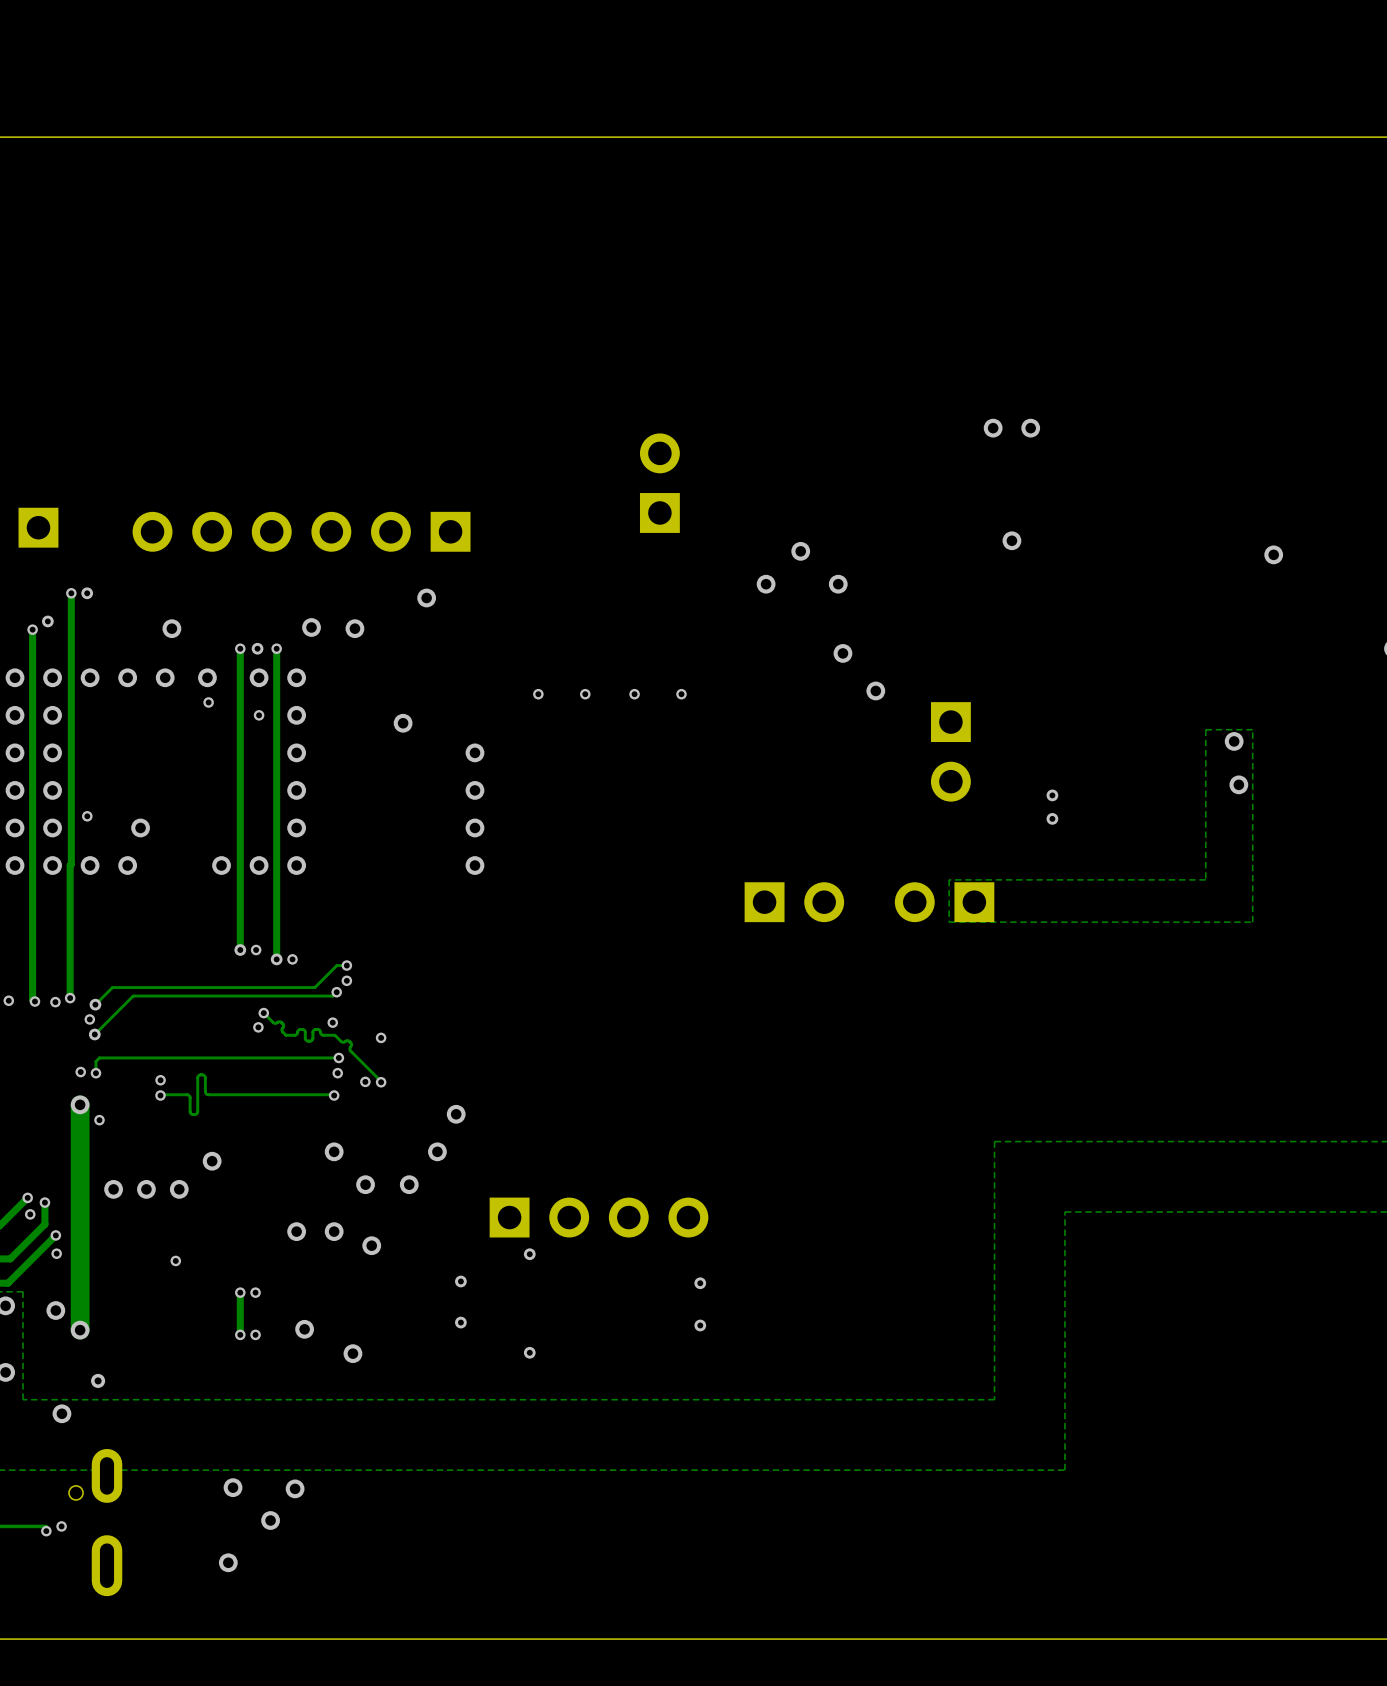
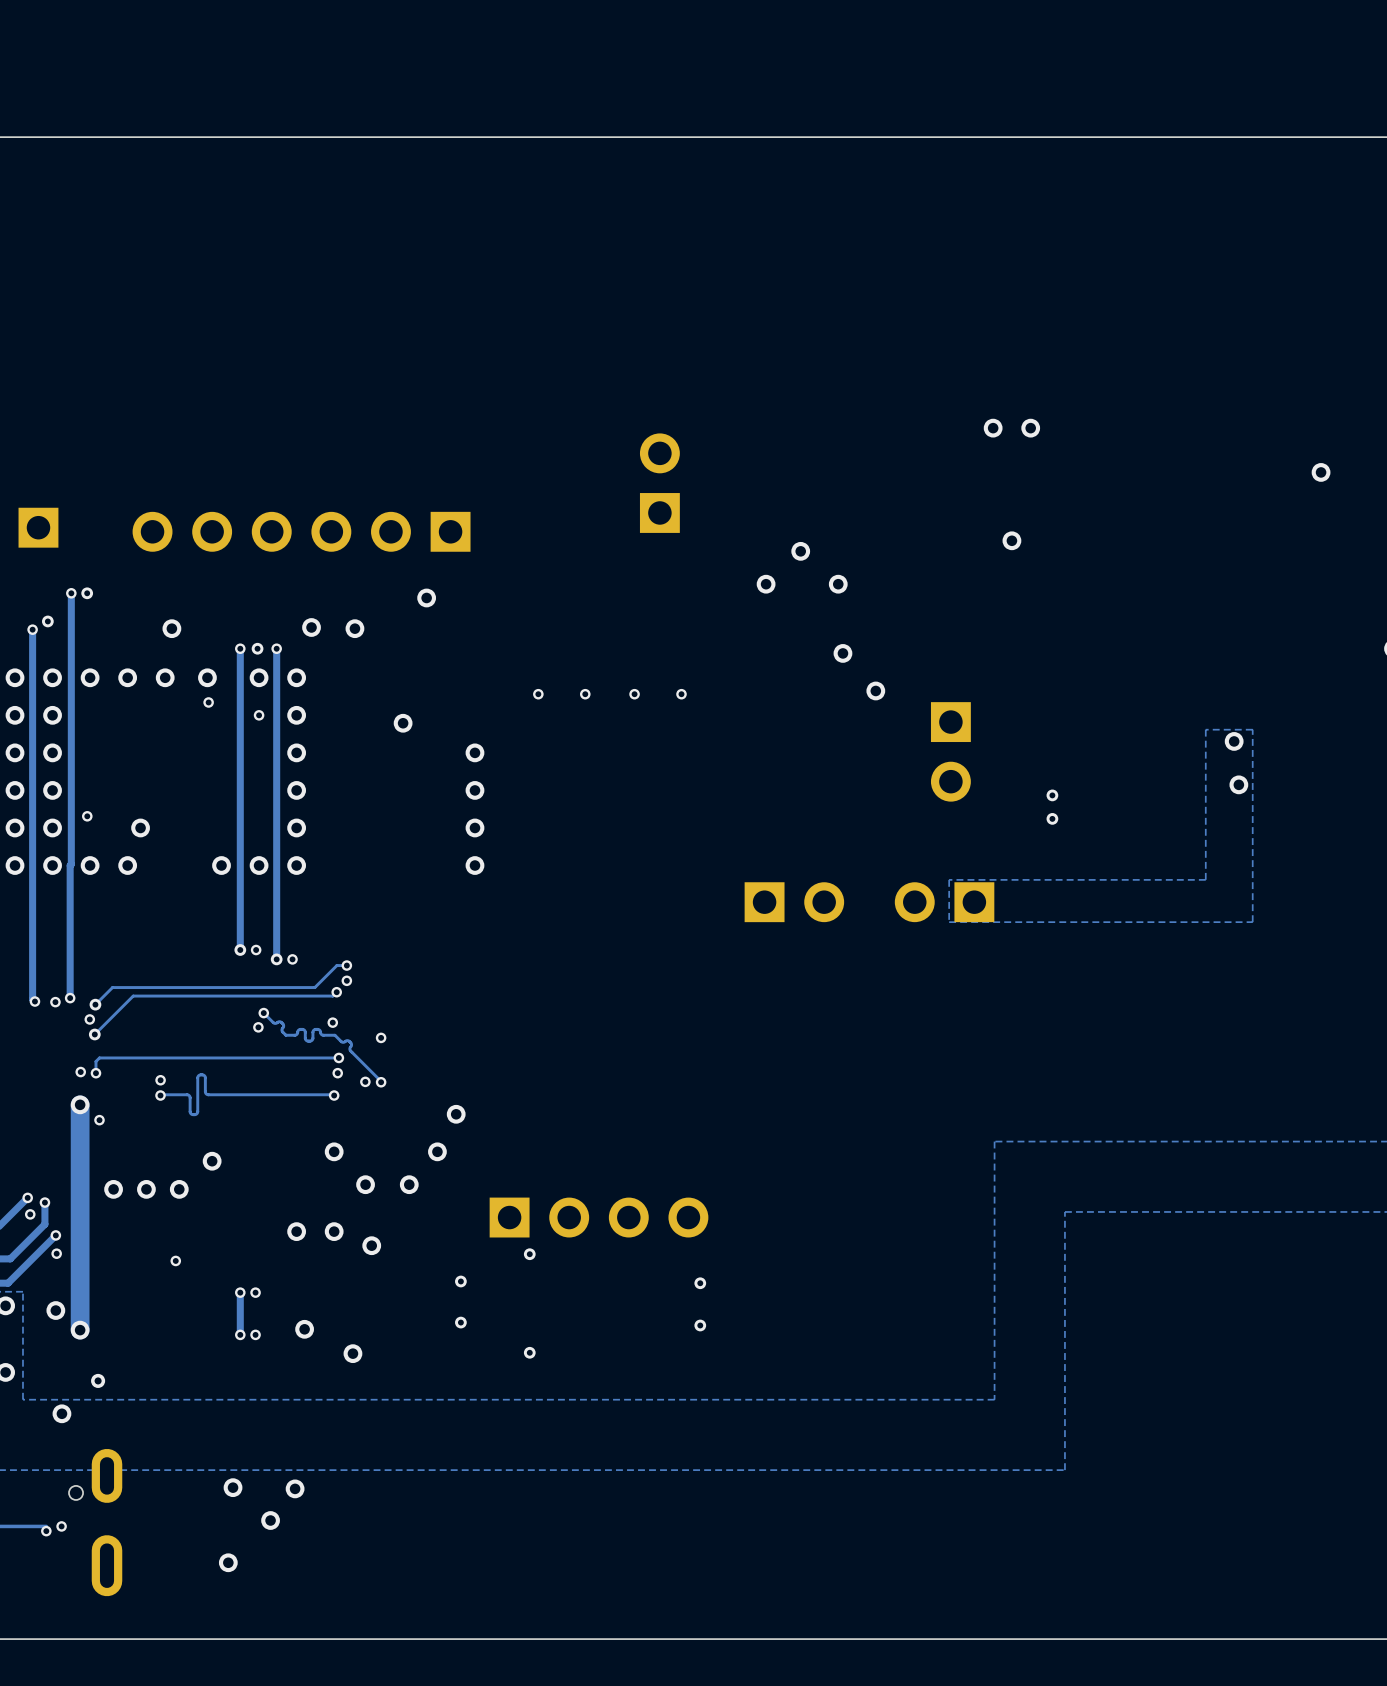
via position: (1273, 554) -> (1321, 472)
via: (8, 1000) -> none

